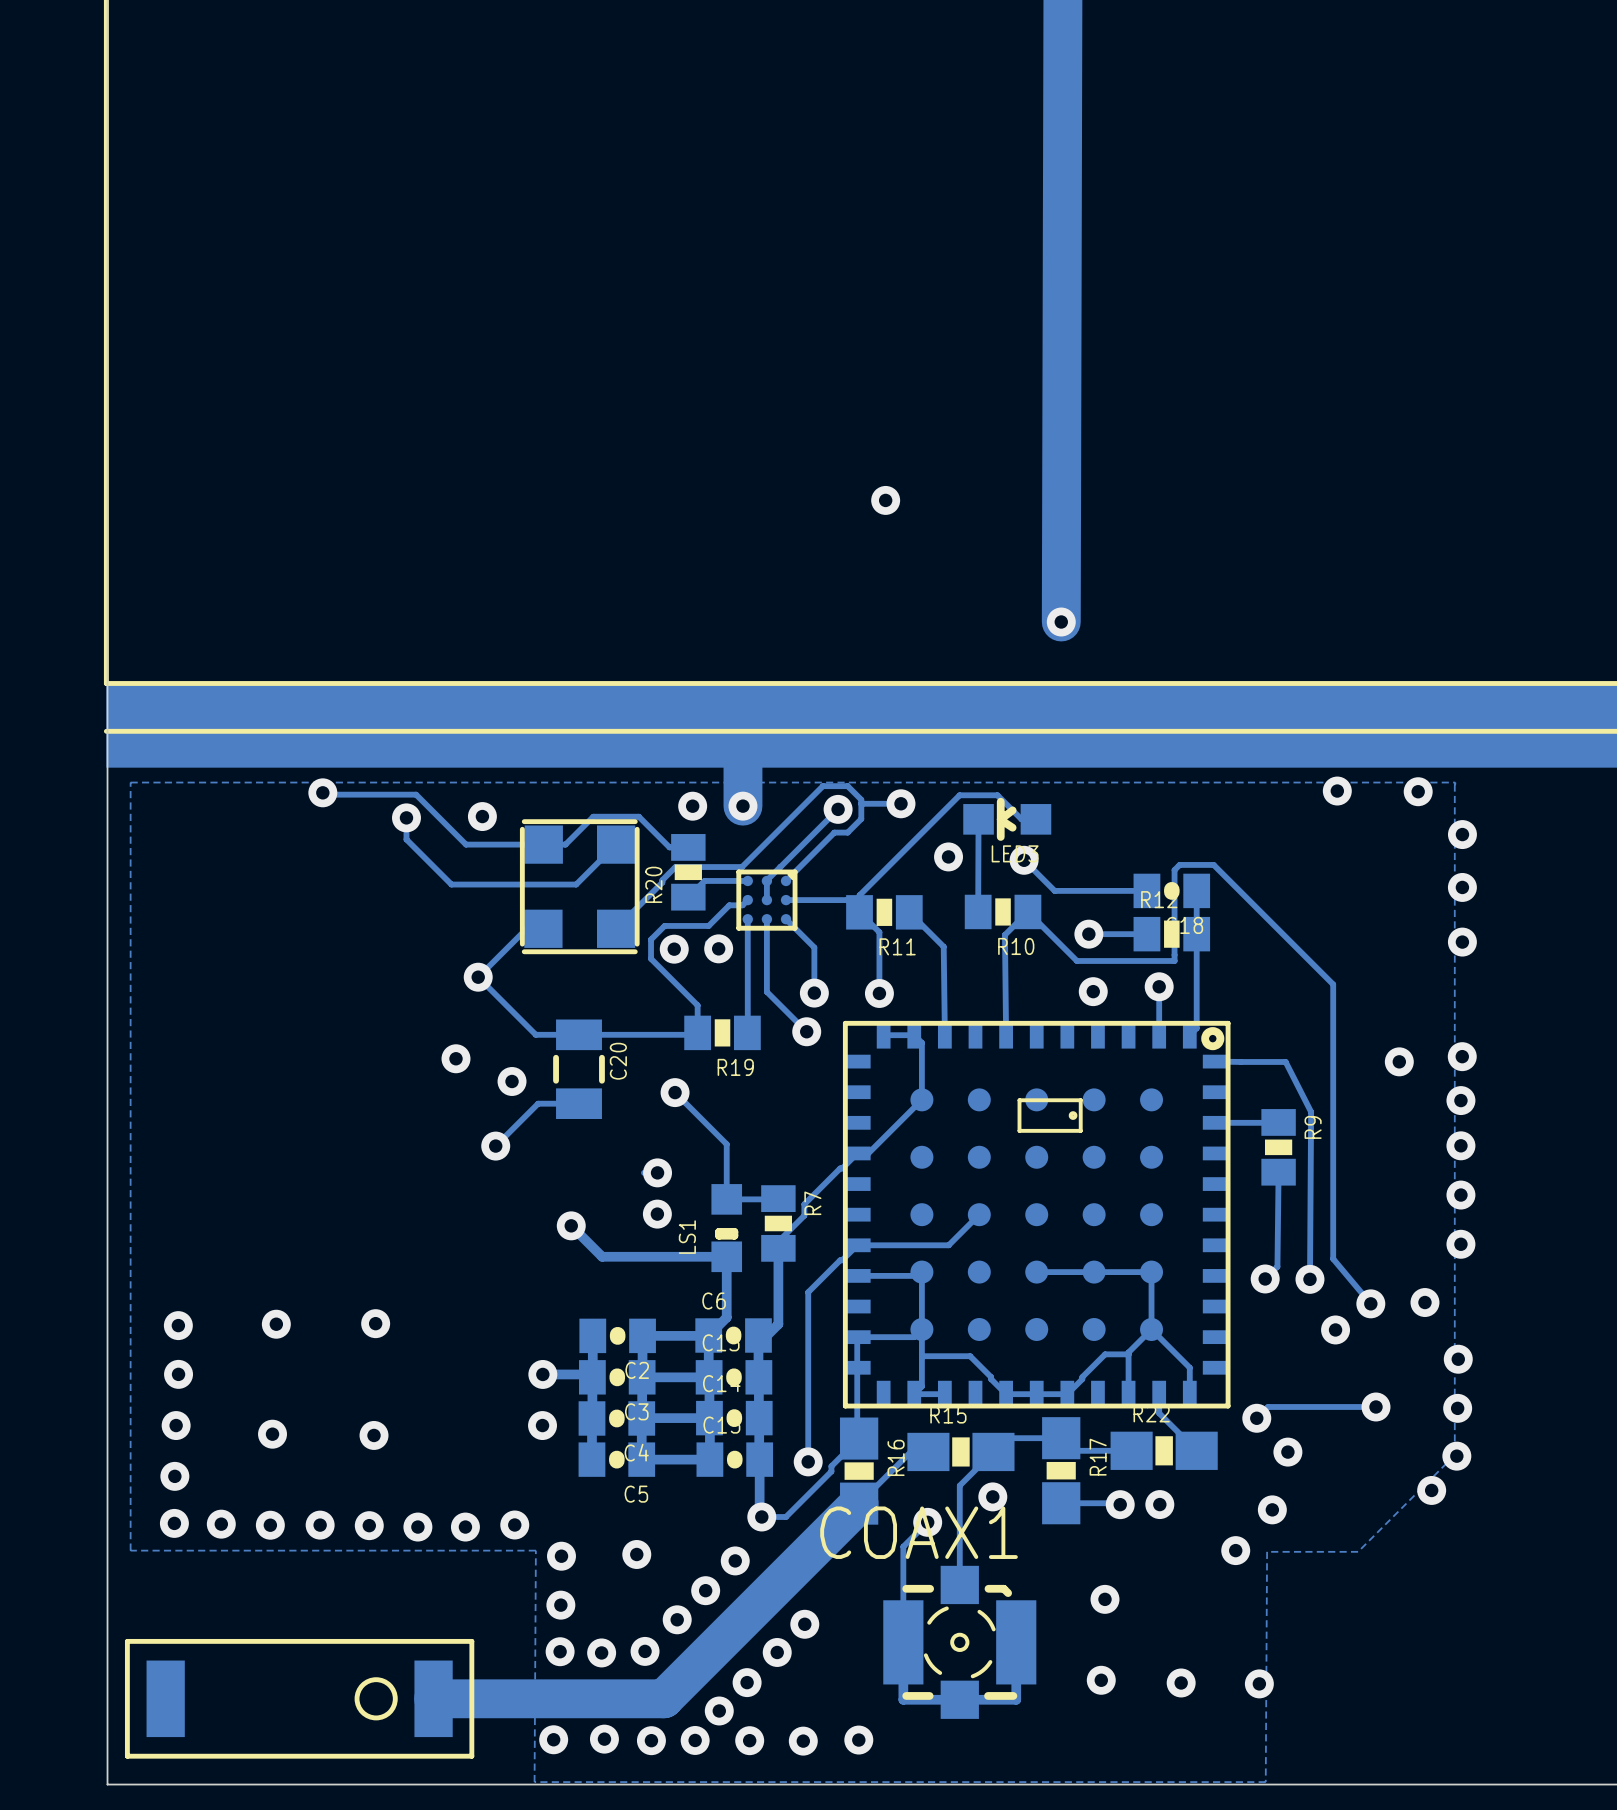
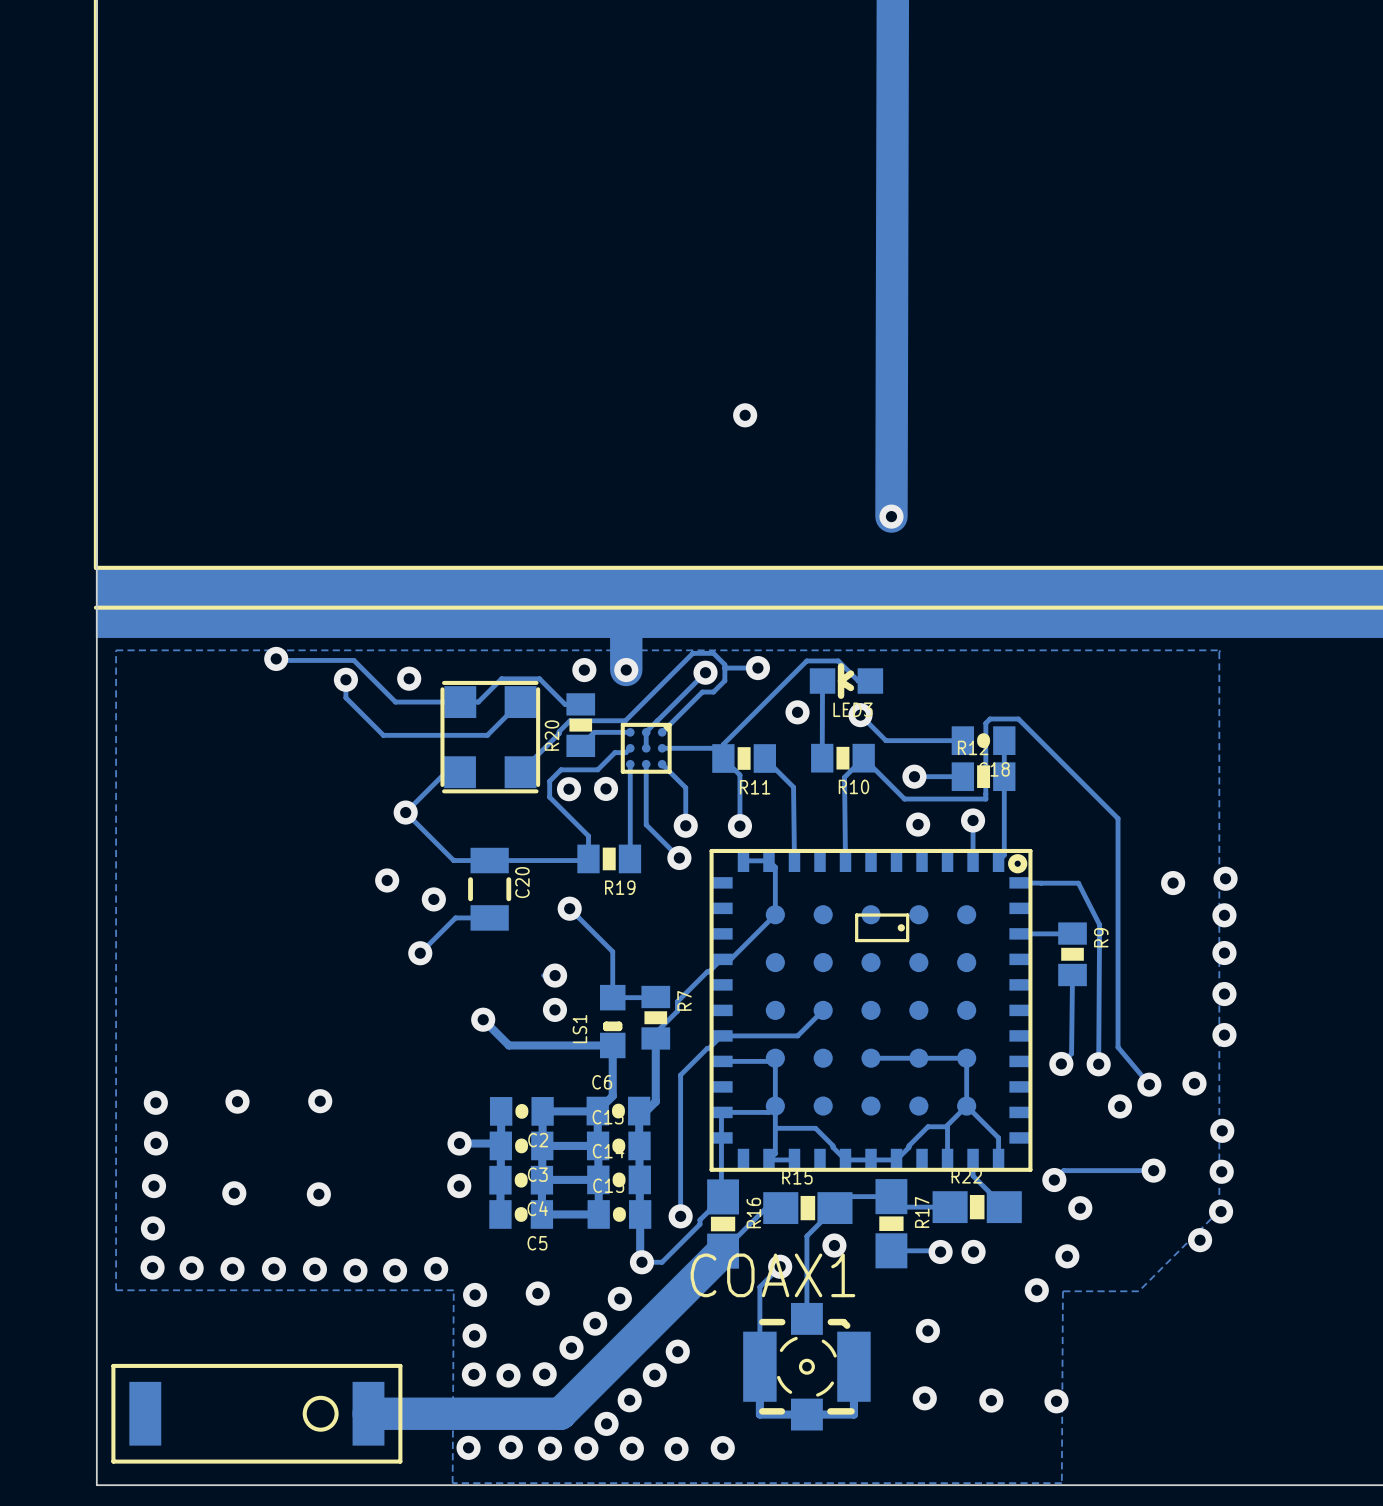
via: (1337, 791) -> none
via: (1418, 791) -> none
via: (1462, 834) -> none
via: (1462, 887) -> none
via: (1462, 942) -> none

